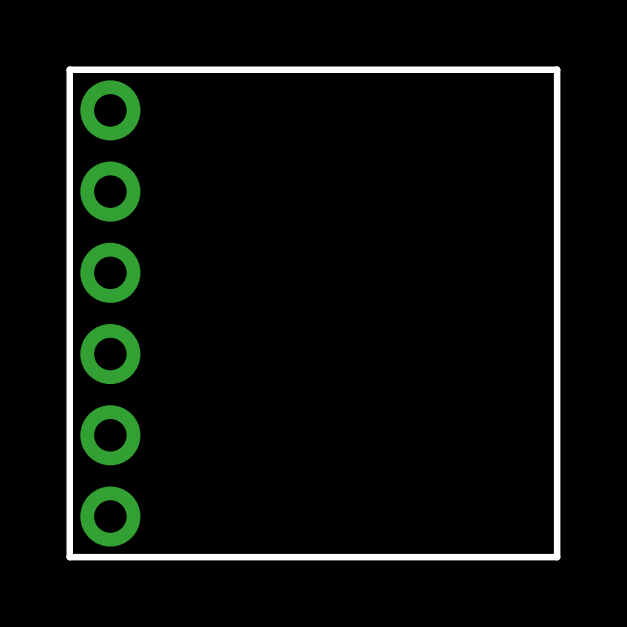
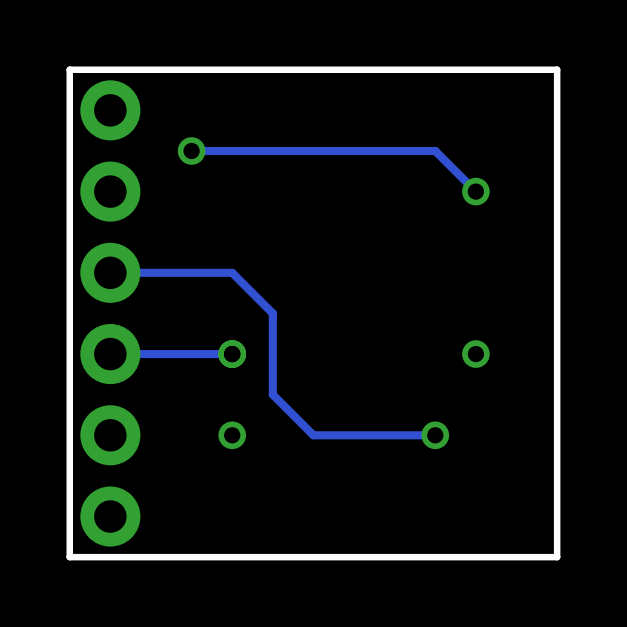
track: none -> (191, 150) (435, 150) (475, 191)
via: none -> (191, 150)
via: none -> (475, 191)
track: none -> (110, 272) (232, 272) (272, 313) (272, 394) (313, 435) (435, 435)
track: none -> (232, 354) (110, 354)
via: none -> (232, 354)
via: none -> (475, 354)
via: none -> (232, 435)
via: none -> (435, 435)

